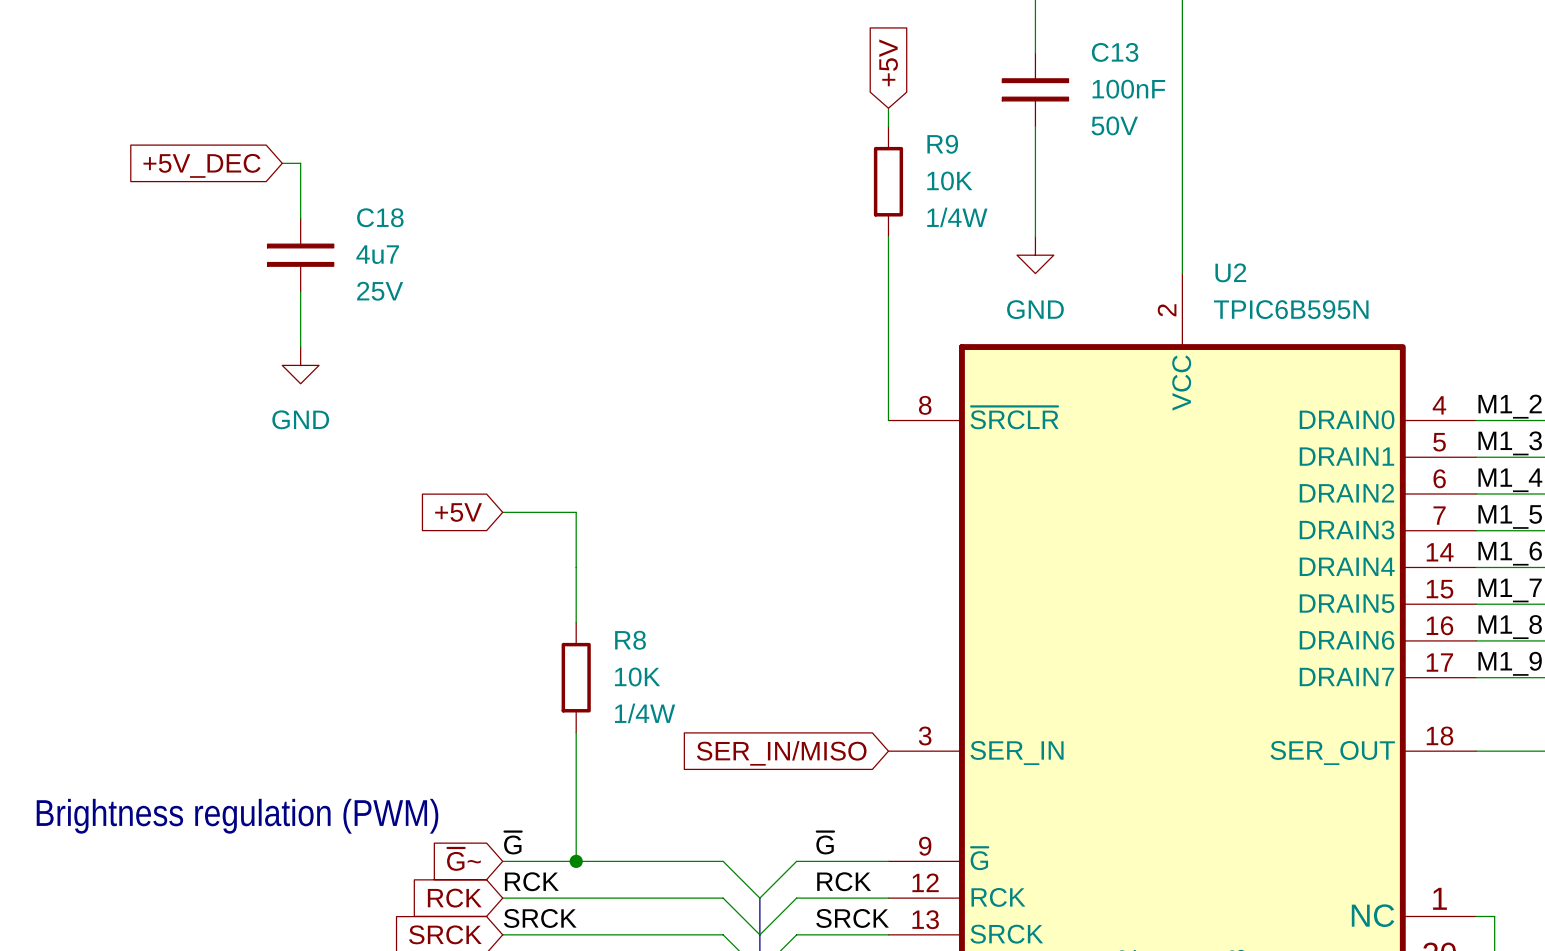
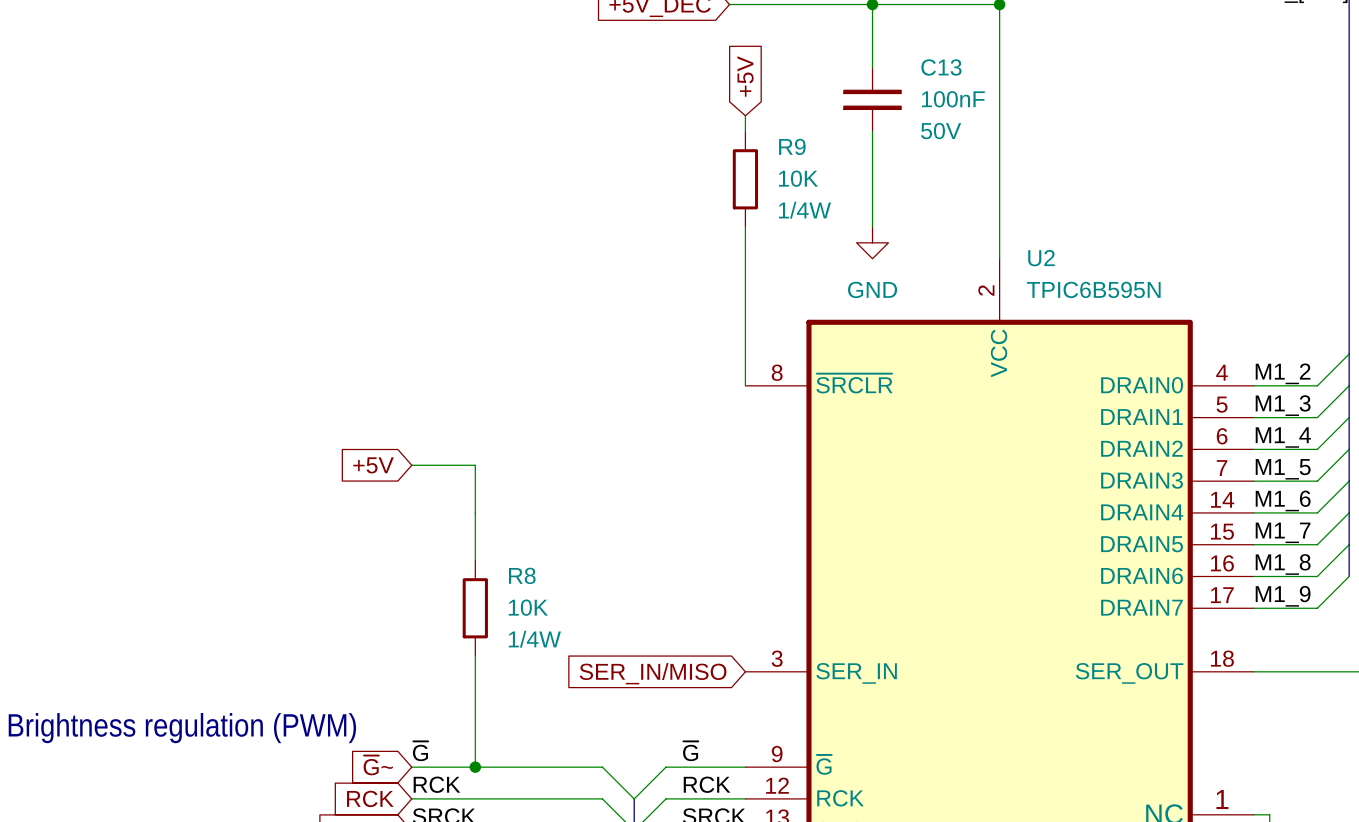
wire: (282, 163) (300, 163) (300, 218) -> none
global label: +5V_DEC (202, 165) -> none
C18: 4u7 (300, 255) -> none
wire: (300, 291) (300, 347) -> none
power symbol: GND (300, 365) -> none

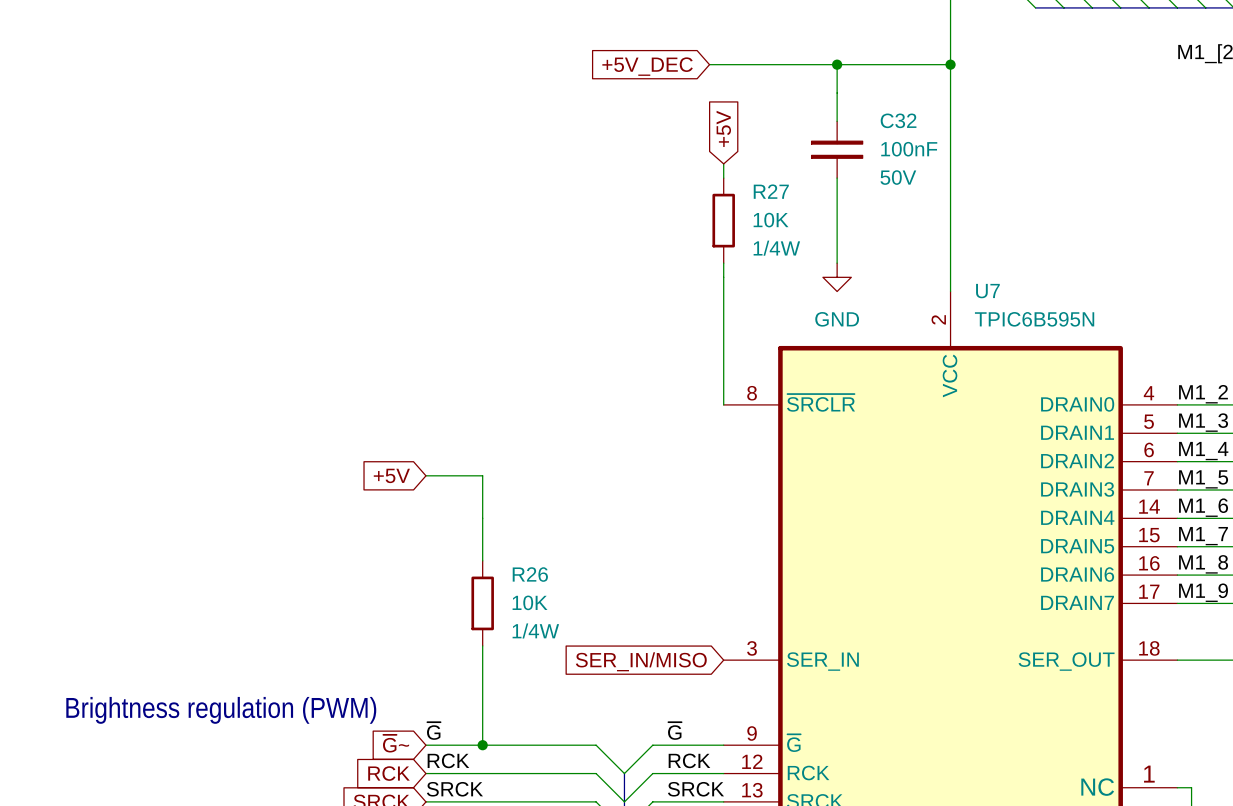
C13 name: C13 (941, 67) -> C32 (898, 120)
R9 name: R9 (792, 146) -> R27 (771, 191)
U2 name: U2 (1041, 258) -> U7 (987, 291)
R8 name: R8 (522, 575) -> R26 (530, 574)

